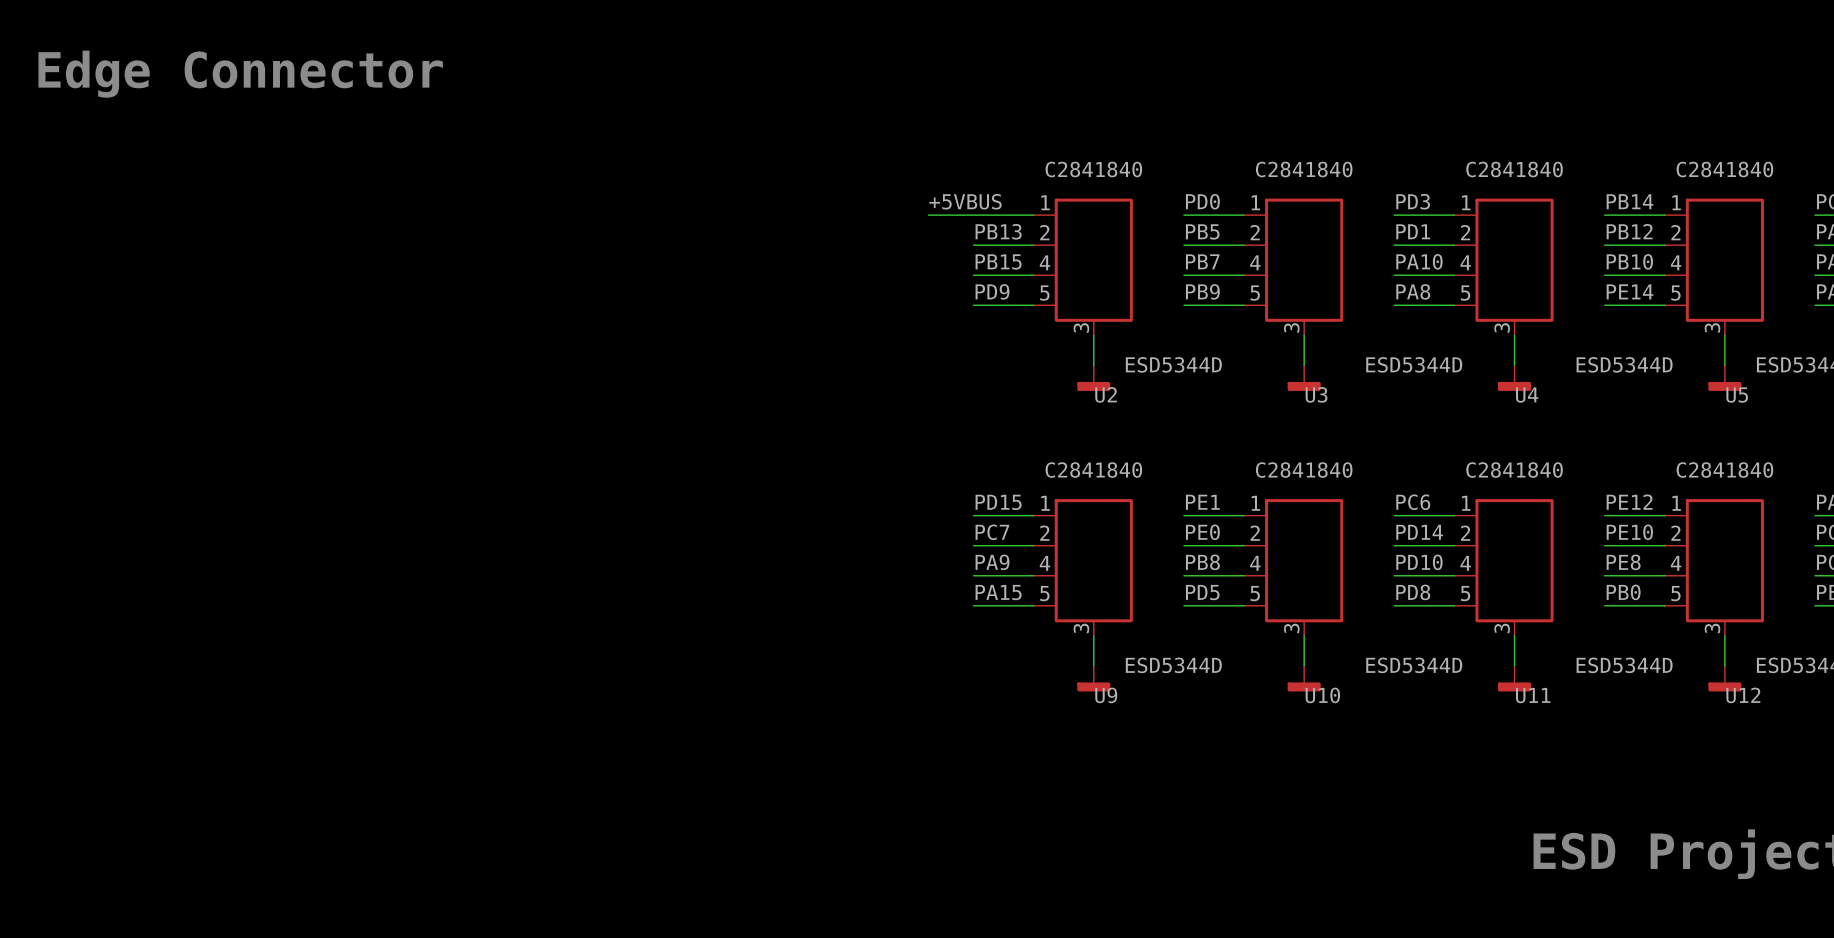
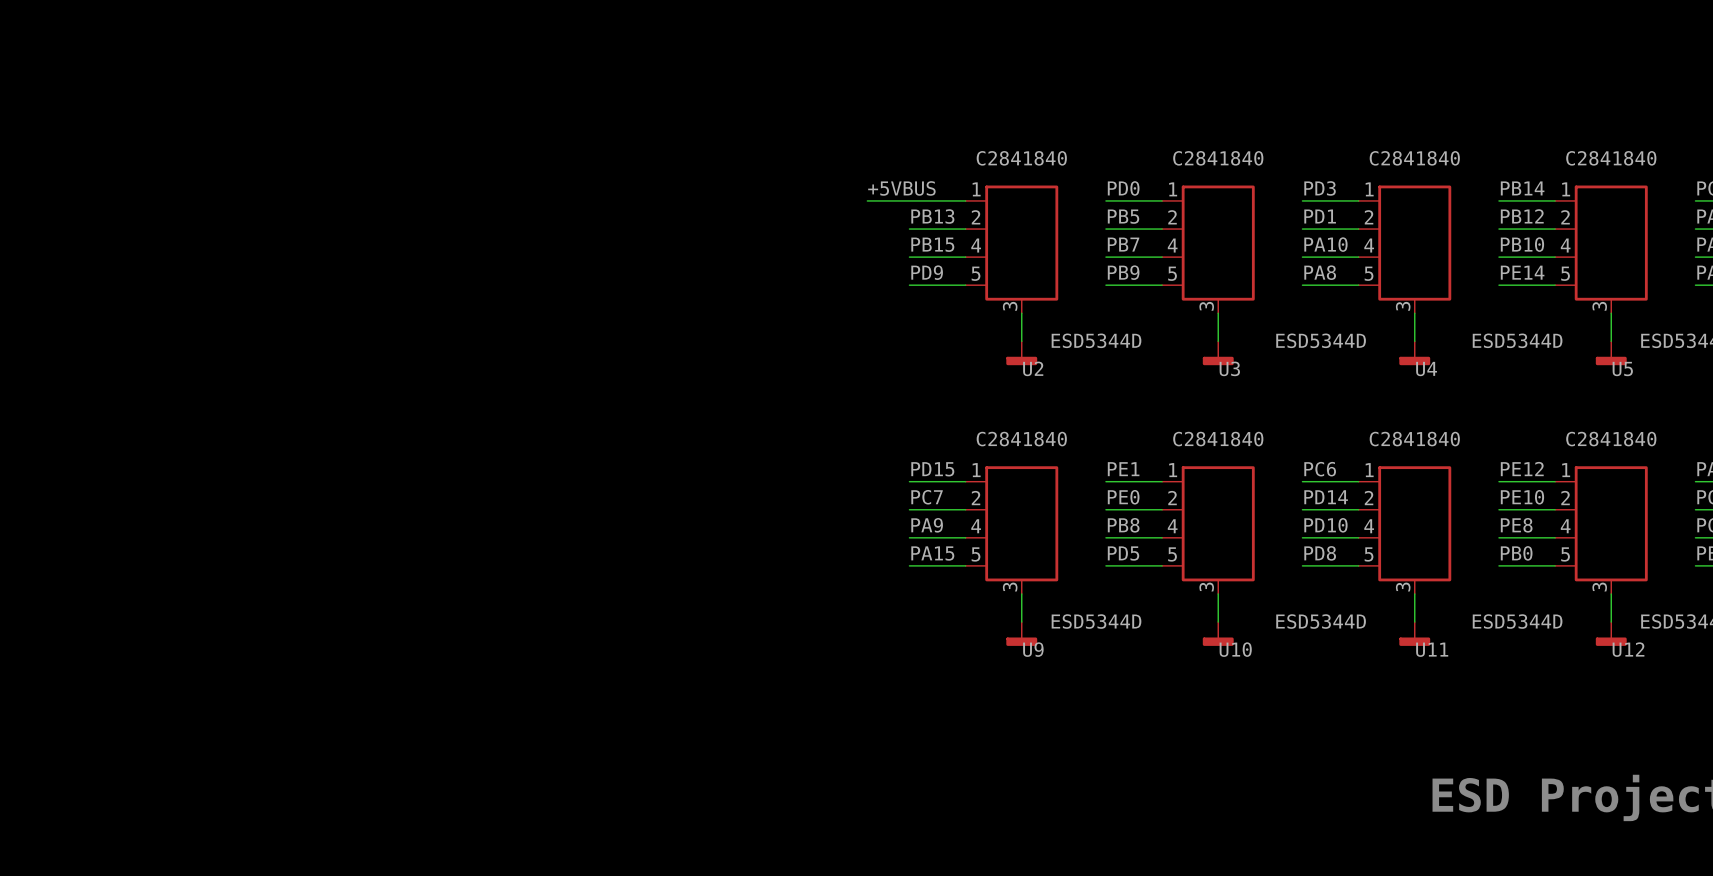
text: Edge Connector (240, 74) -> none

